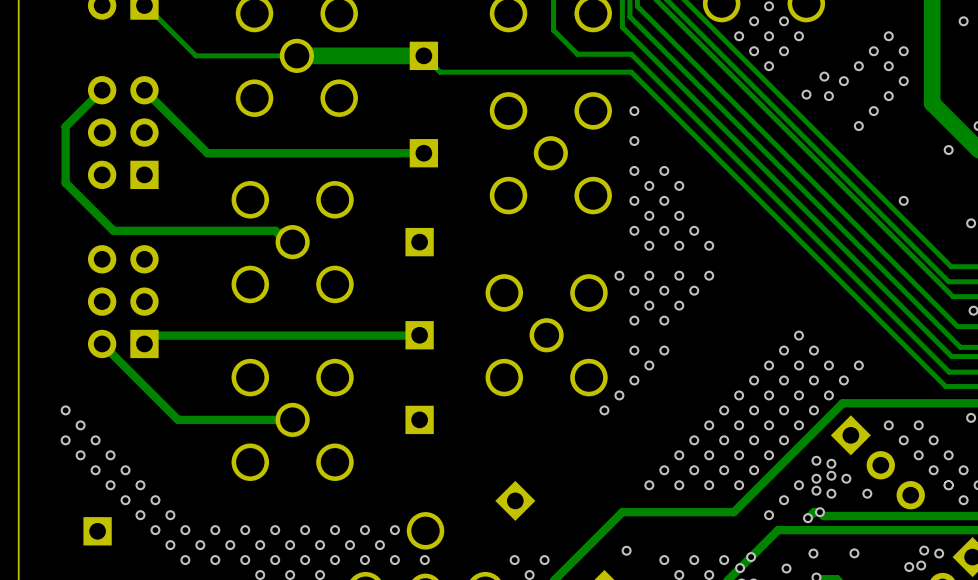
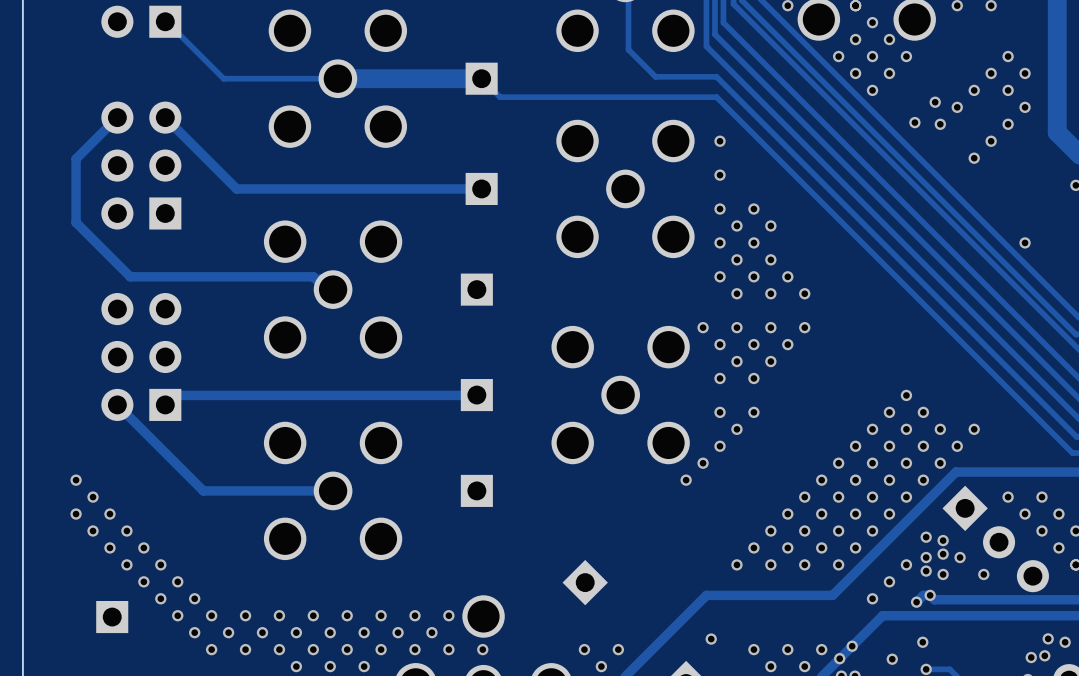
via: (854, 553) -> none

